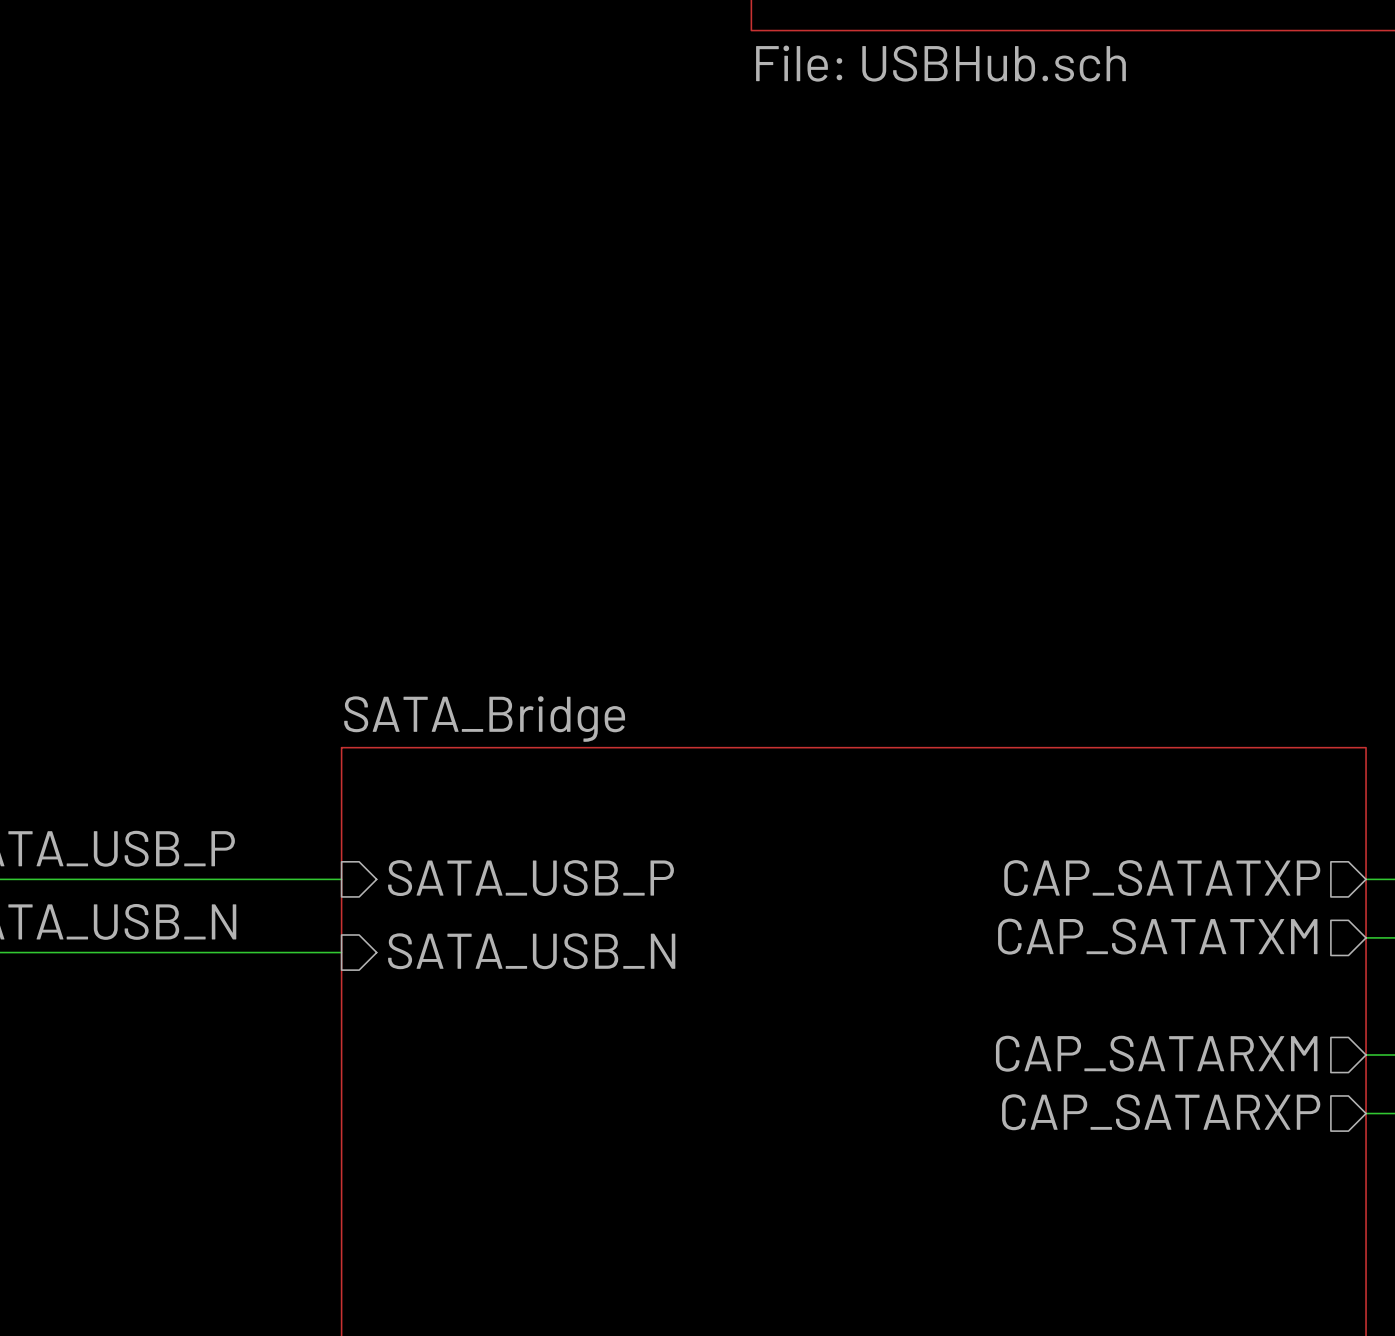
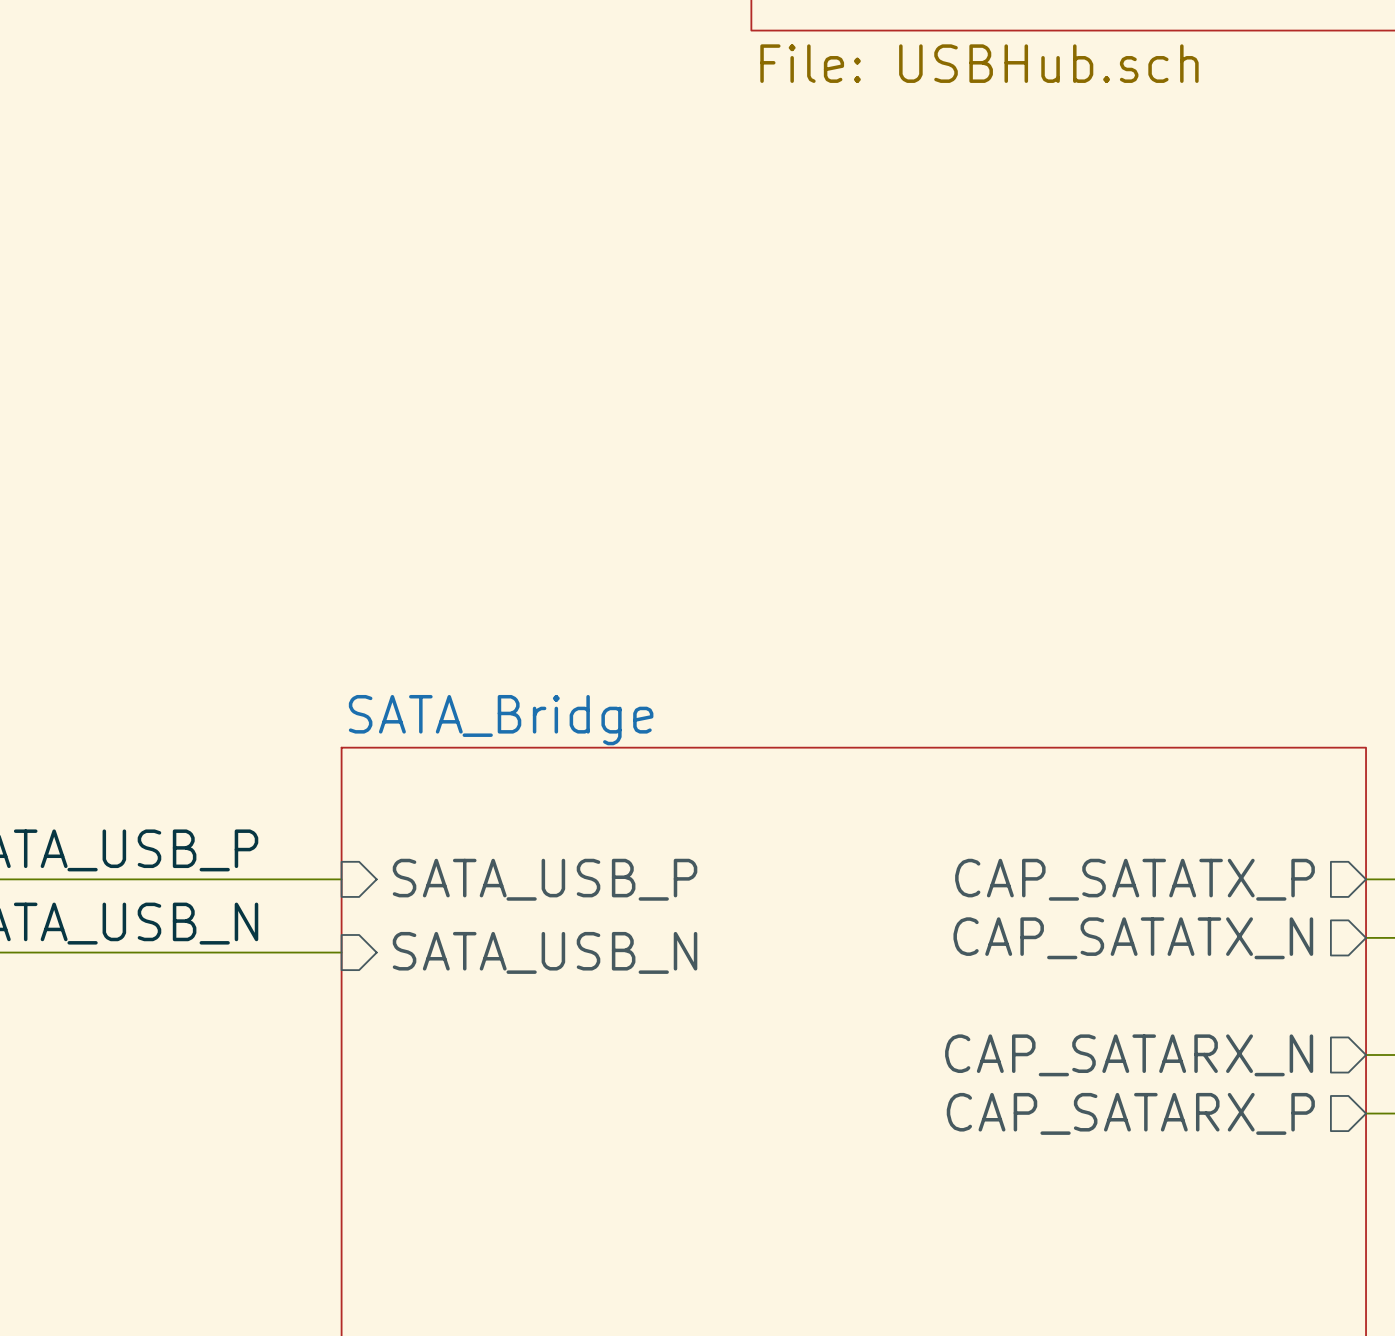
sheet pin: CAP_SATATXP (1162, 878) -> CAP_SATATX_P (1135, 879)
sheet pin: CAP_SATATXM (1157, 936) -> CAP_SATATX_N (1133, 938)
sheet pin: CAP_SATARXM (1156, 1053) -> CAP_SATARX_N (1129, 1055)
sheet pin: CAP_SATARXP (1161, 1112) -> CAP_SATARX_P (1130, 1113)

